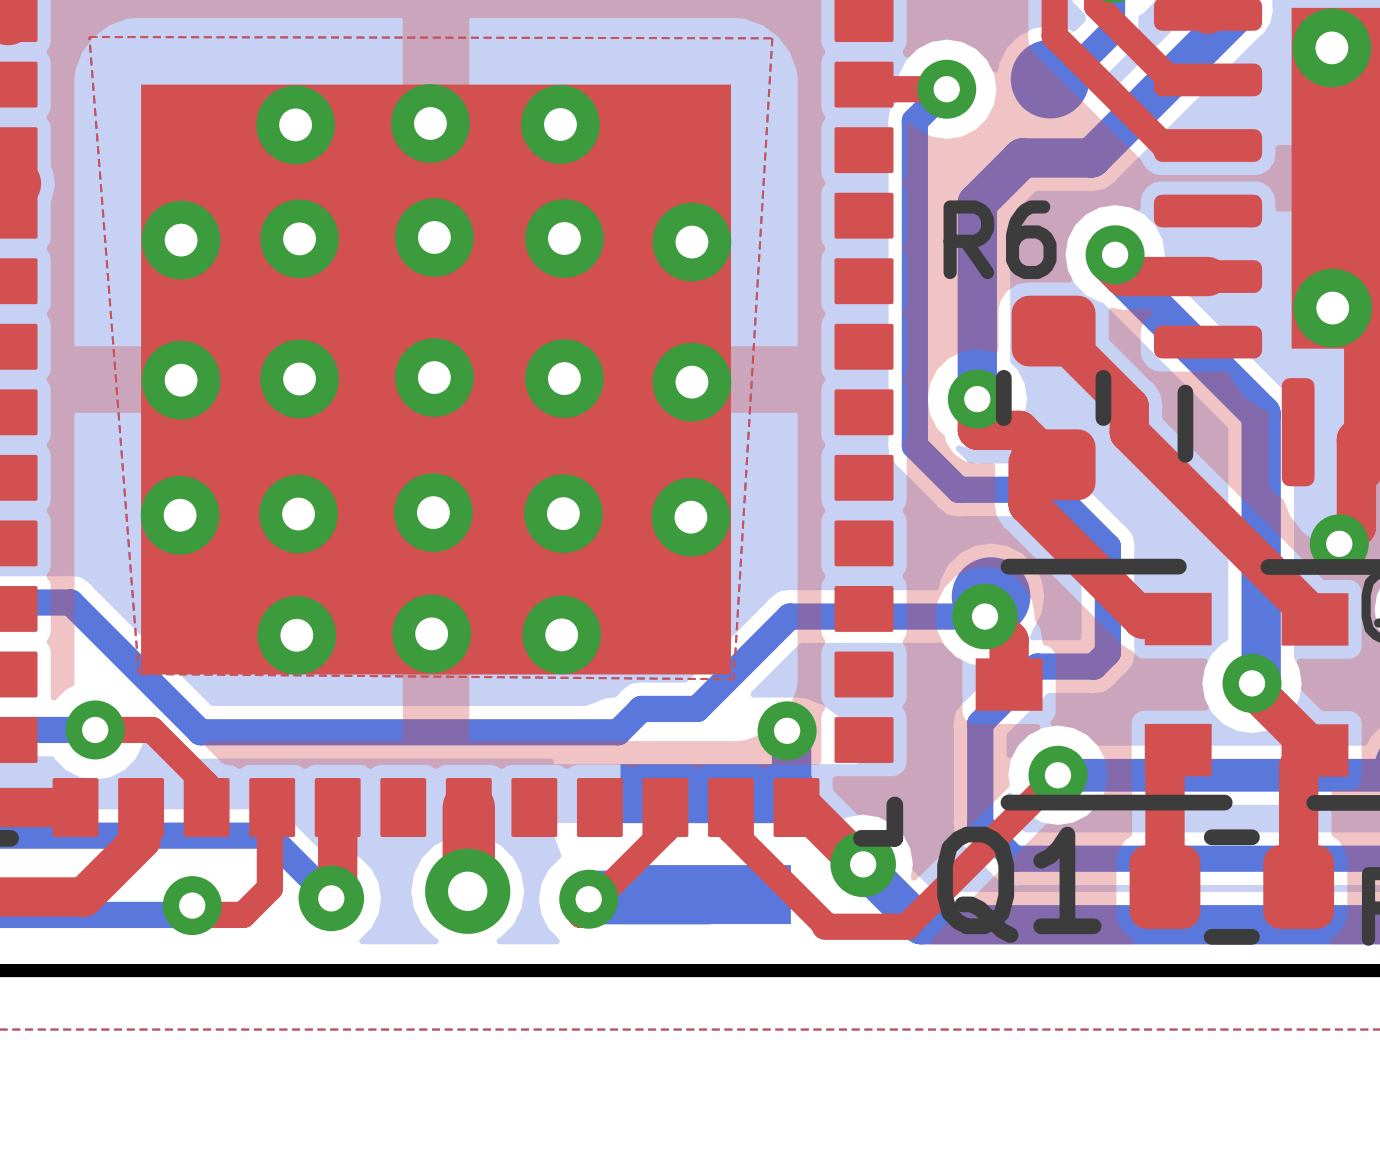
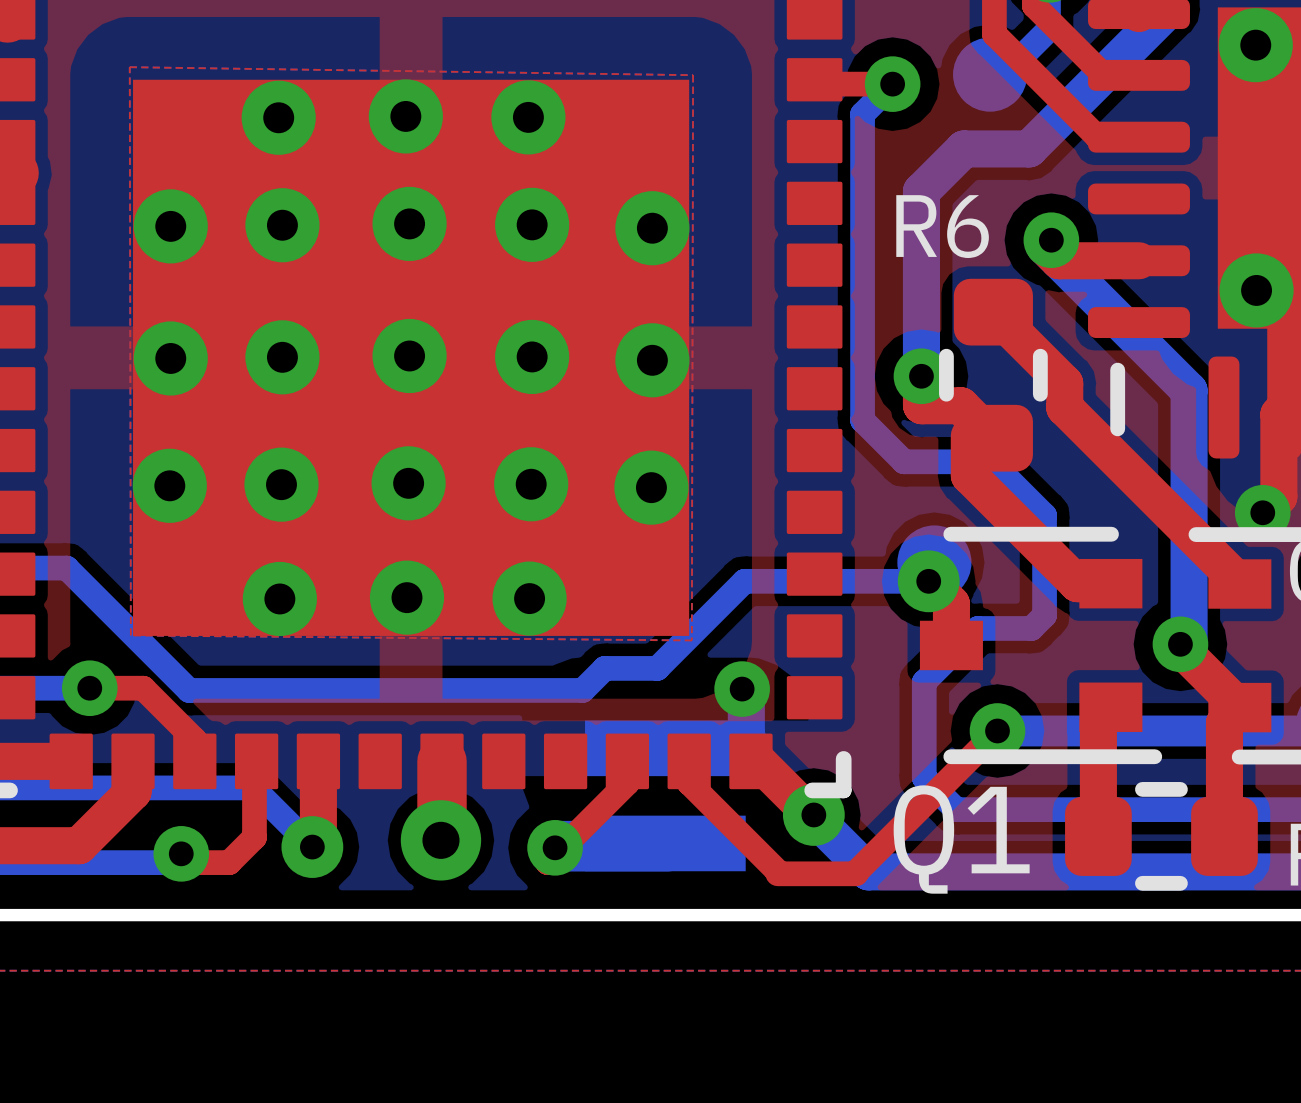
top zone outline: (138, 673) (89, 36) (772, 38) (733, 679) -> (130, 635) (129, 67) (693, 75) (691, 640)

